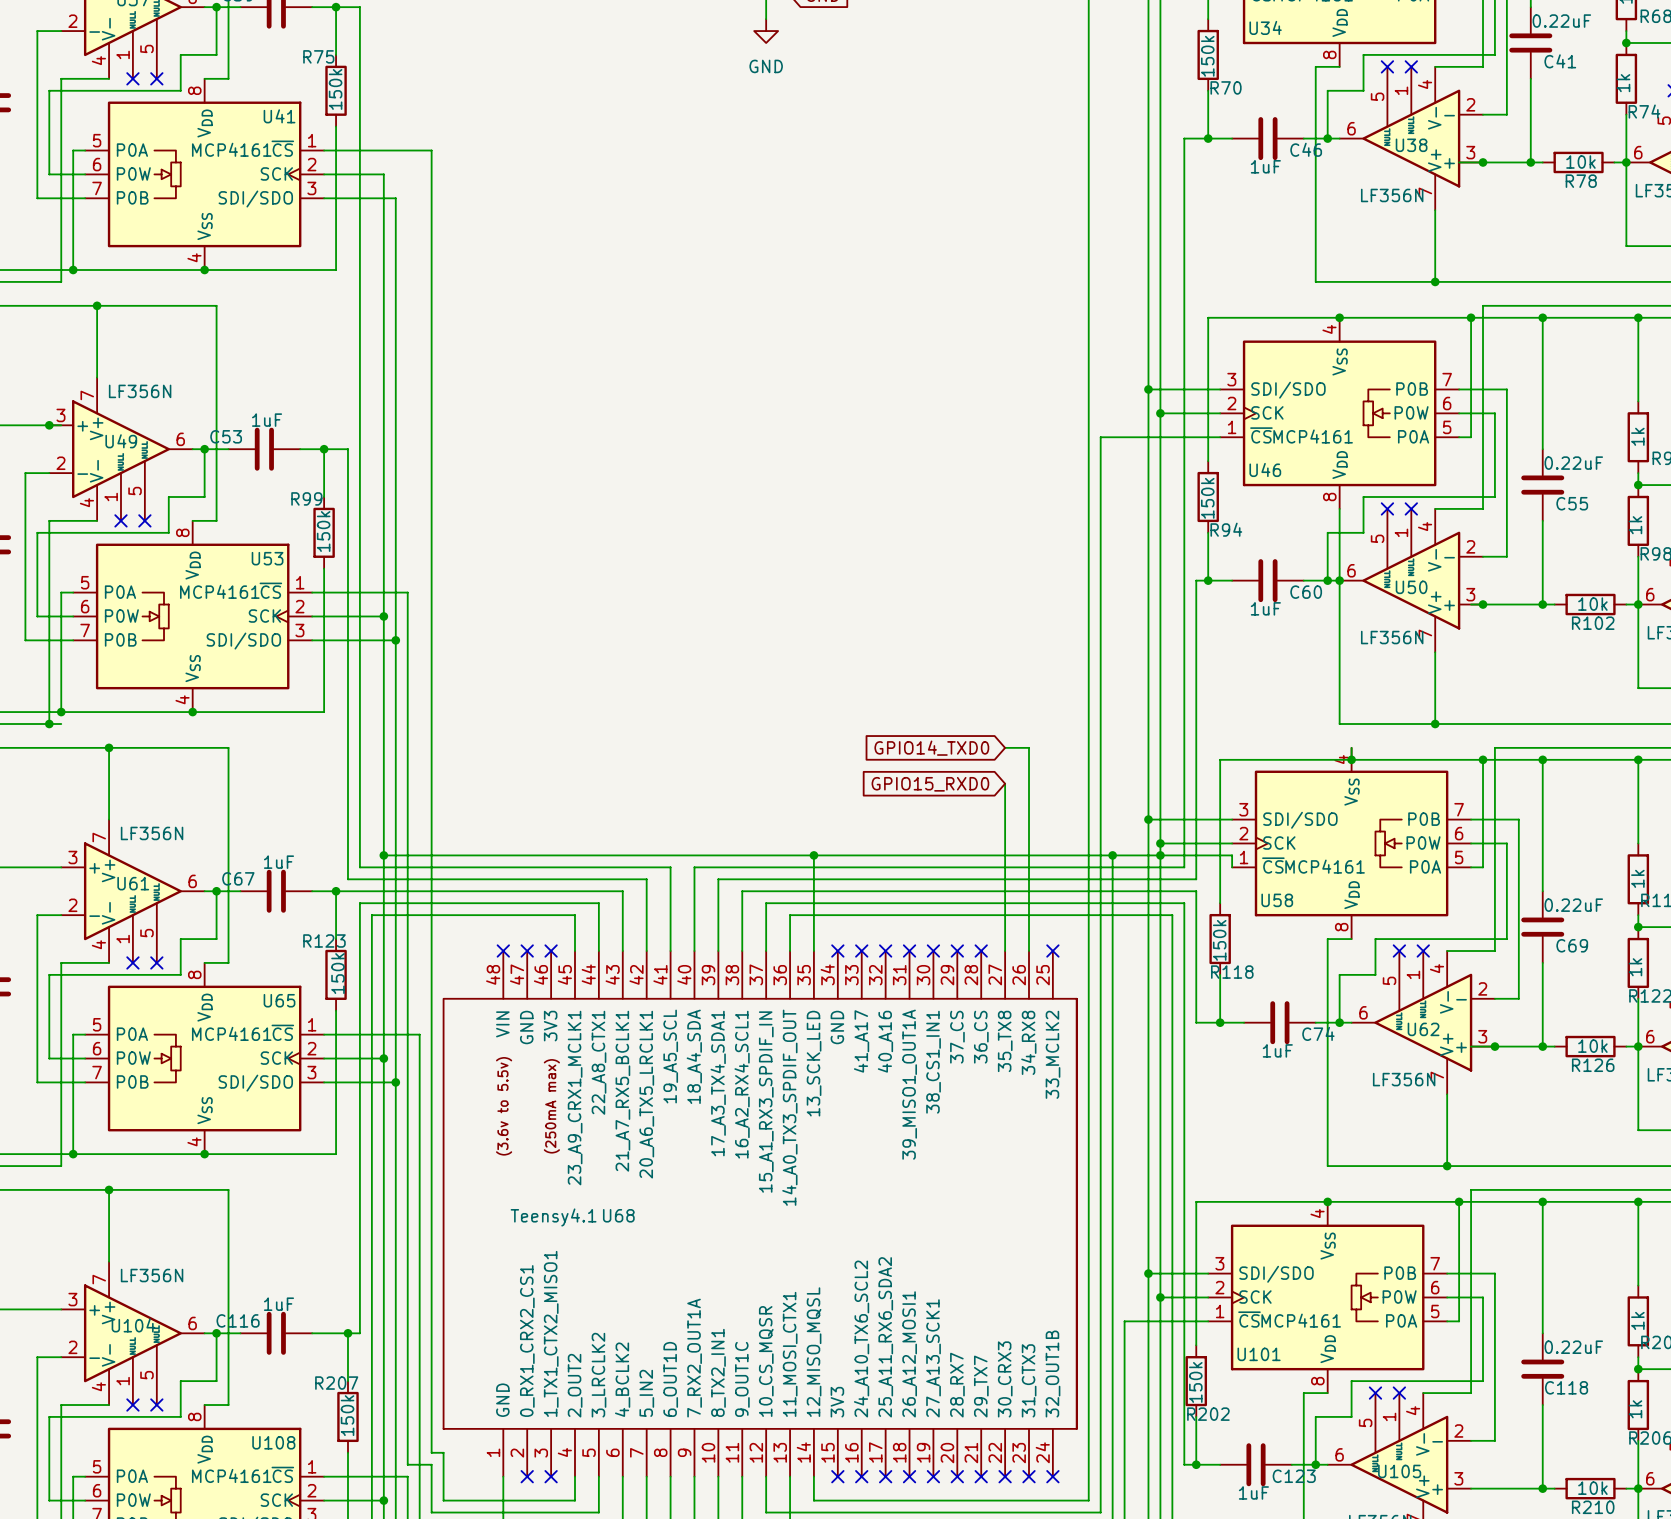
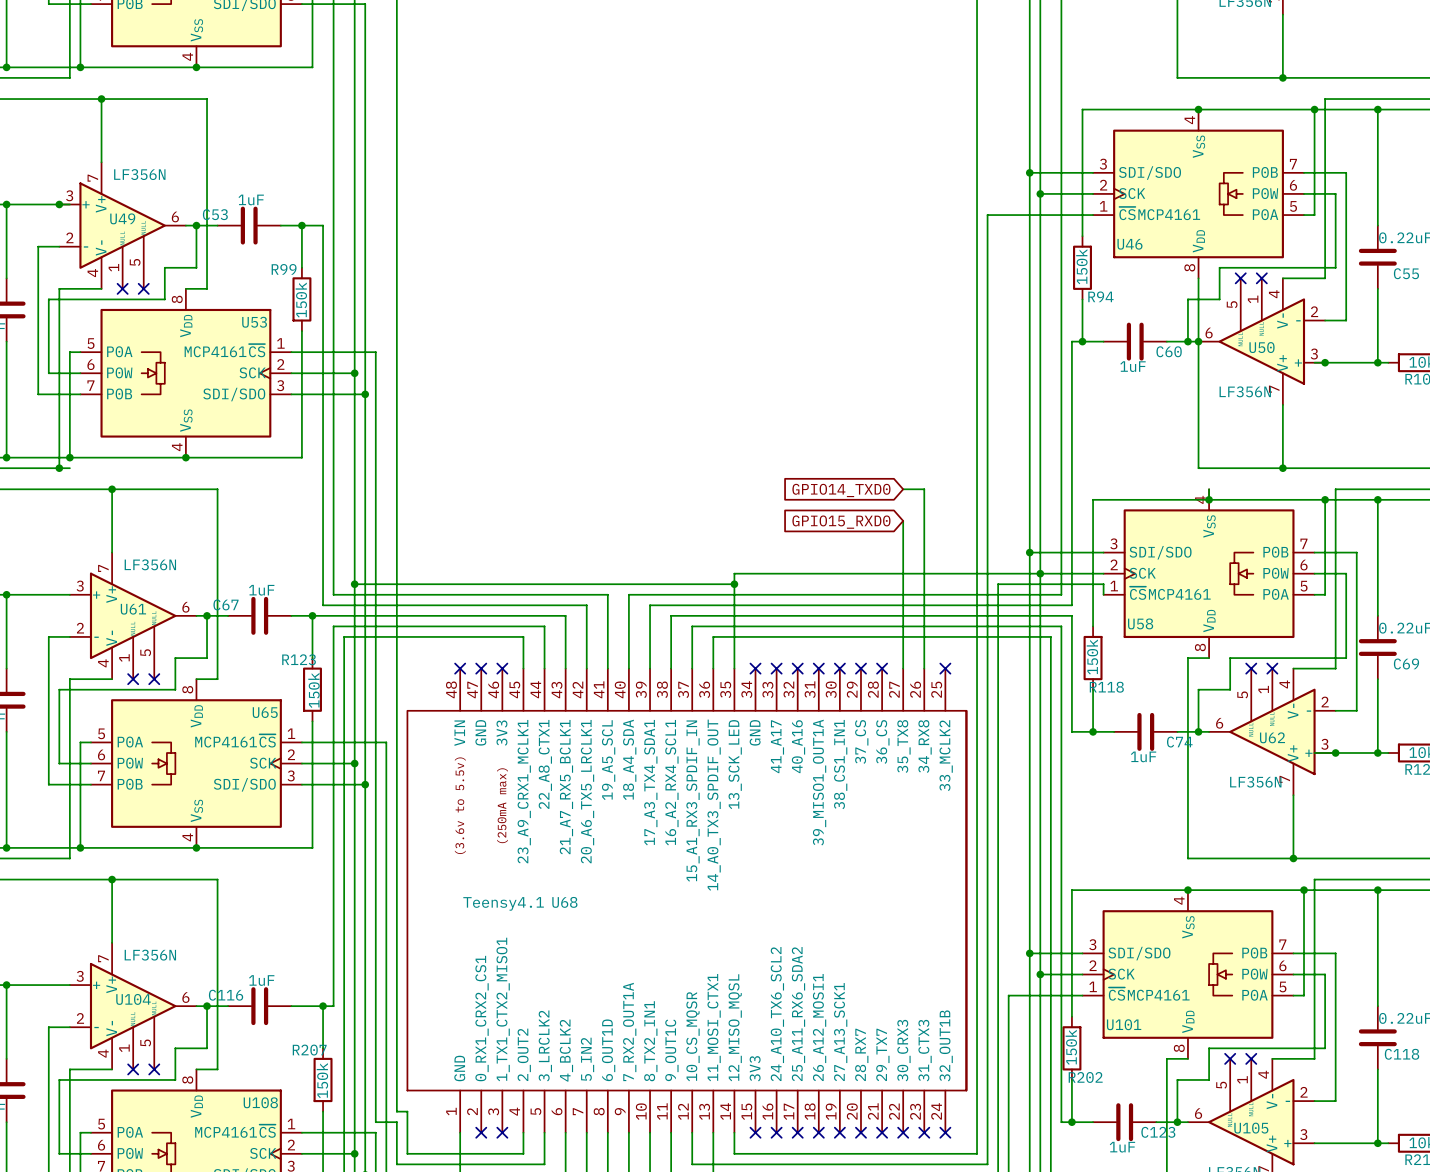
wire: (813, 855) (1112, 855) -> (734, 584) (734, 573) (1040, 573)
junction: (1112, 855) -> none
junction: (1160, 855) -> none

